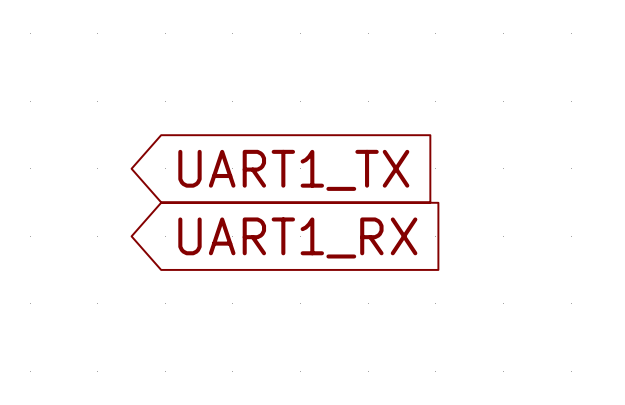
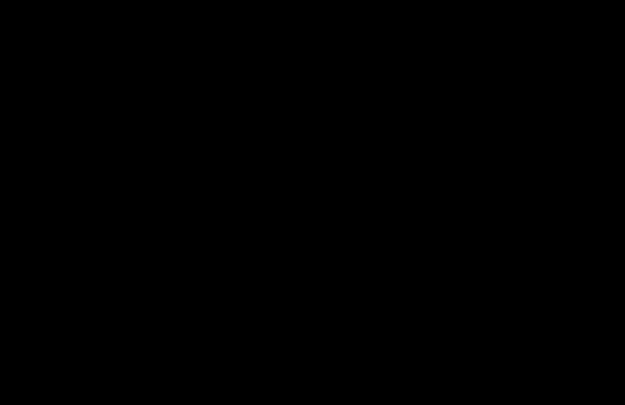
global label: UART1_TX (293, 170) -> none
global label: UART1_RX (297, 237) -> none

